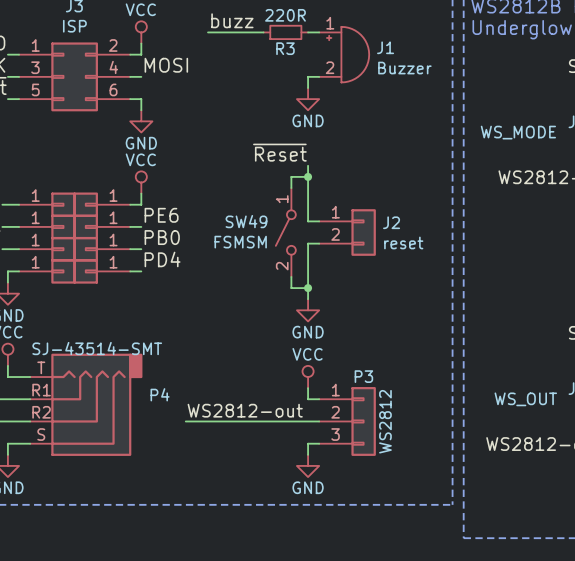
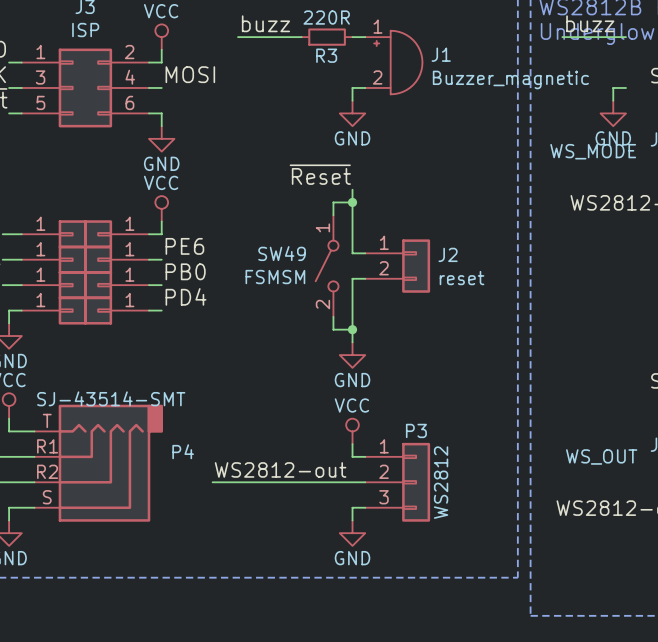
label: none -> buzz (590, 23)
wire: none -> (562, 37) (625, 37)
J1 value: Buzzer (404, 68) -> Buzzer_magnetic (510, 79)
wire: none -> (625, 87) (613, 87) (613, 100)
power symbol: none -> GND (613, 113)

